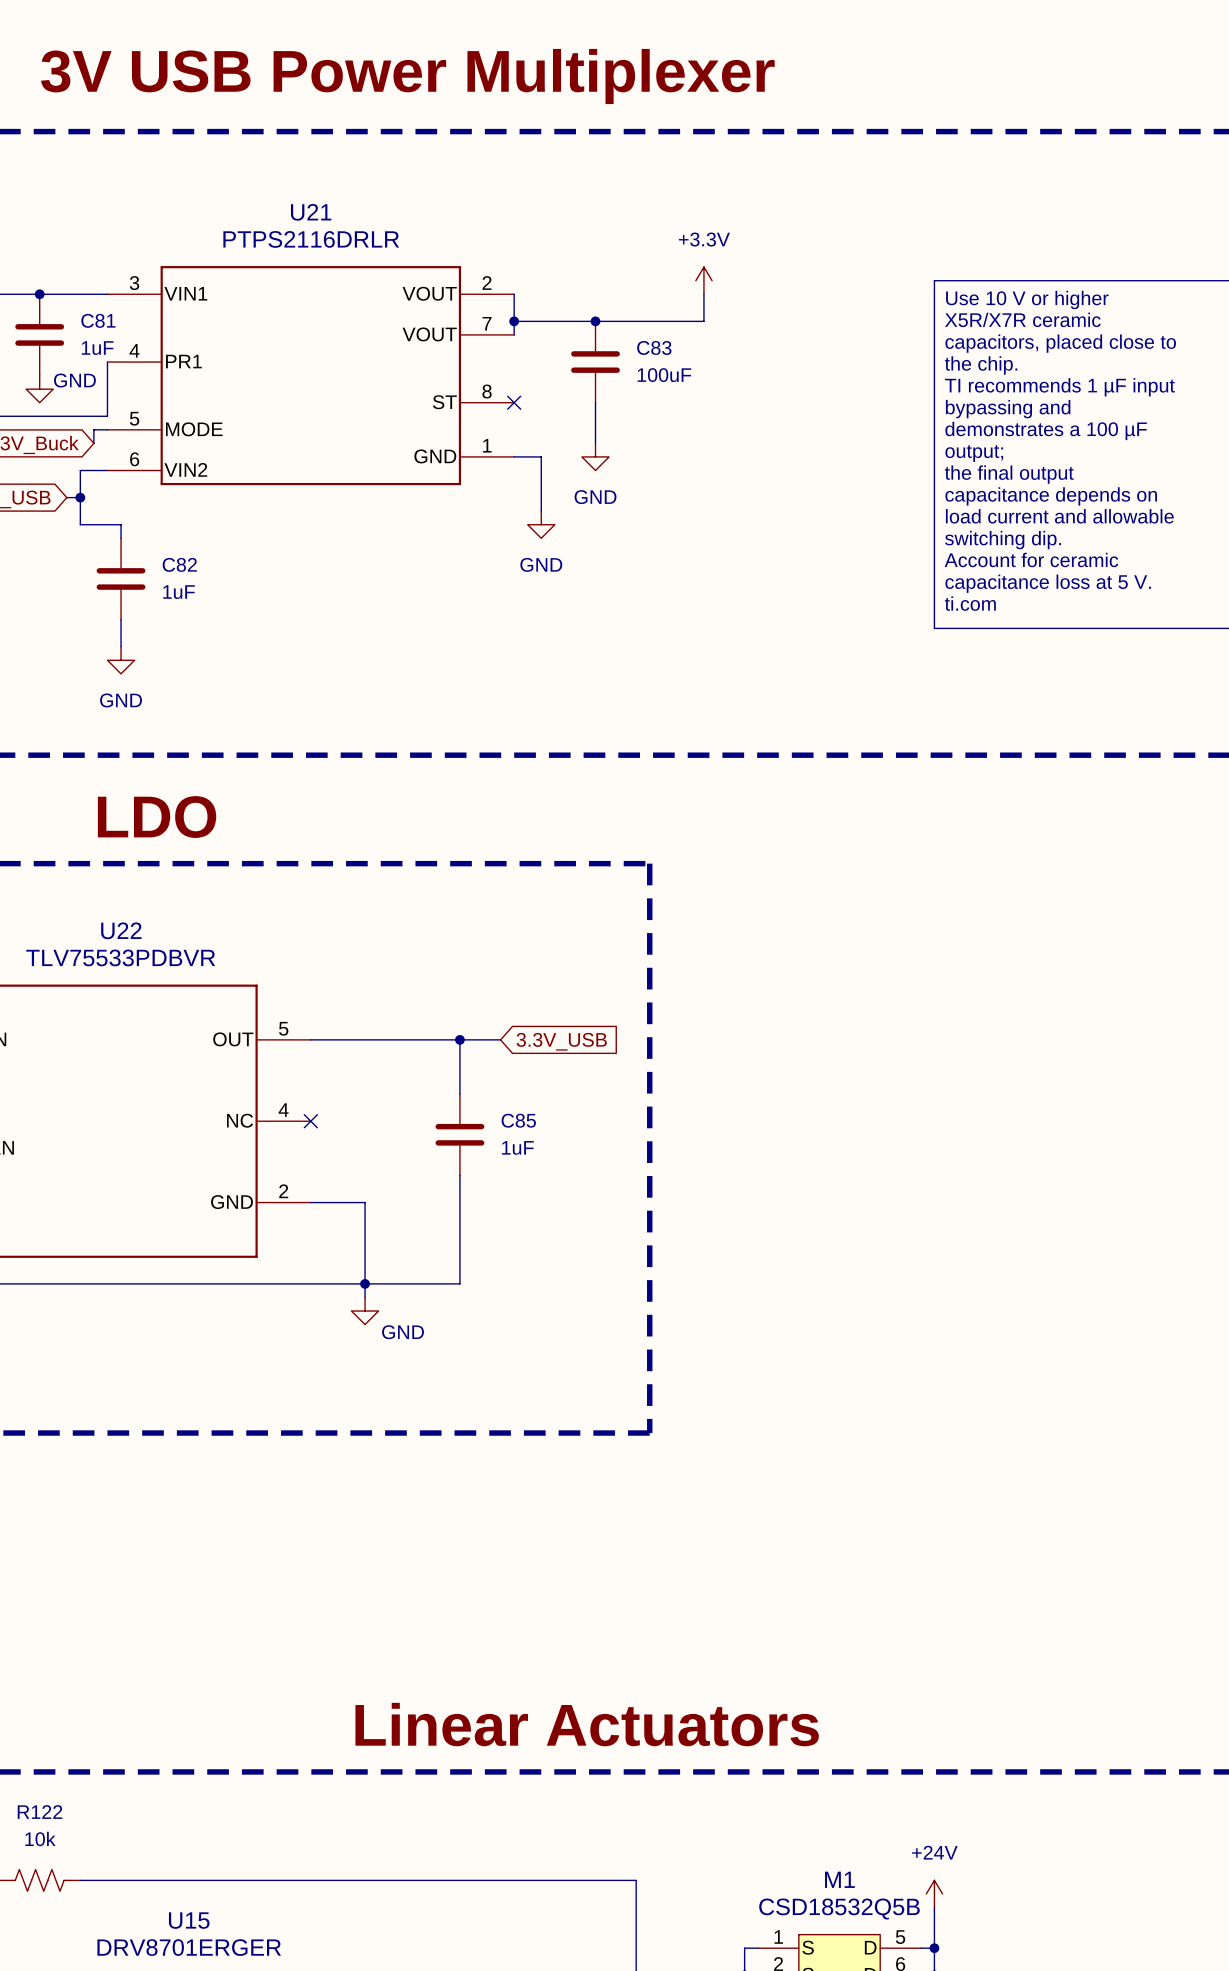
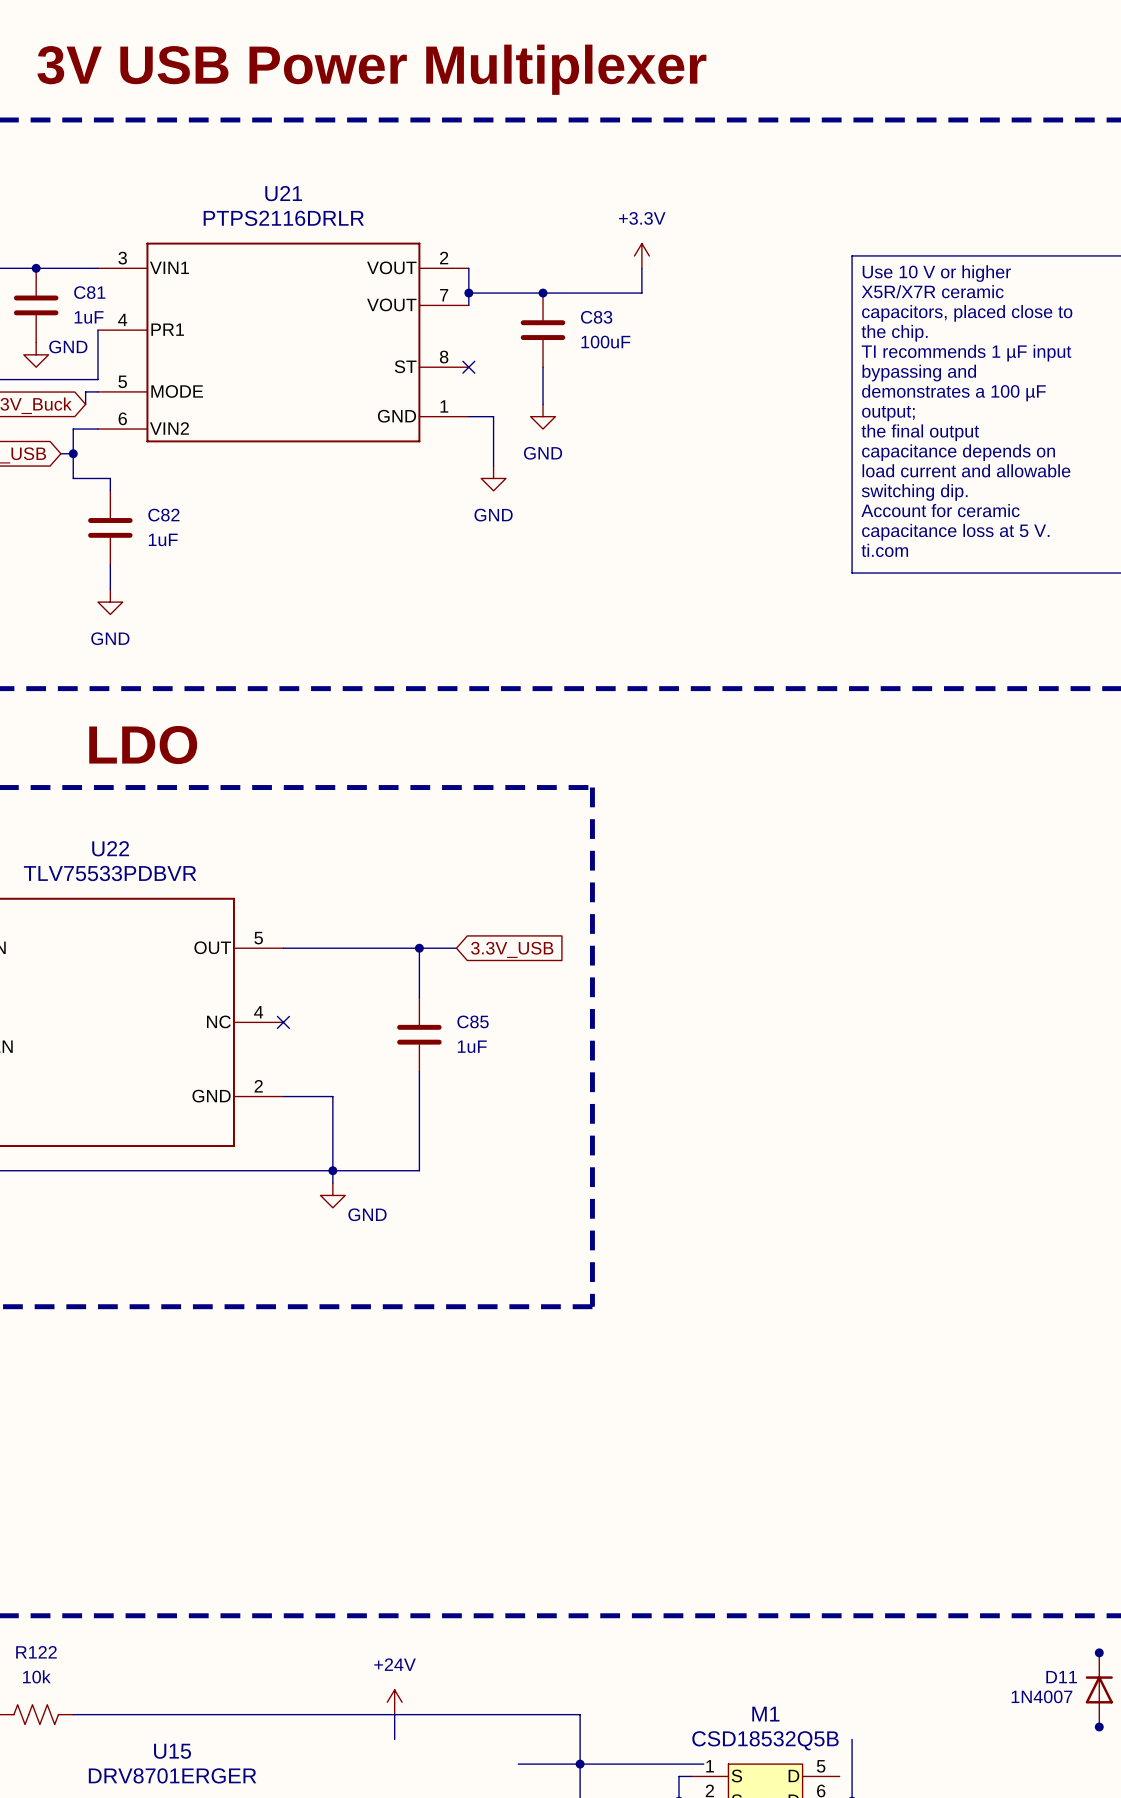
label: Linear Actuators (587, 1724) -> none
junction: none -> (1099, 1652)
D11: none -> 1N4007 (1099, 1689)
power symbol: none -> +24V (394, 1702)
wire: none -> (394, 1714) (394, 1739)
power symbol: +24V (934, 1893) -> none
junction: none -> (1099, 1727)
wire: none -> (518, 1764) (703, 1764)
junction: none -> (580, 1764)
wire: (920, 1948) (934, 1948) -> none
junction: (934, 1948) -> none

